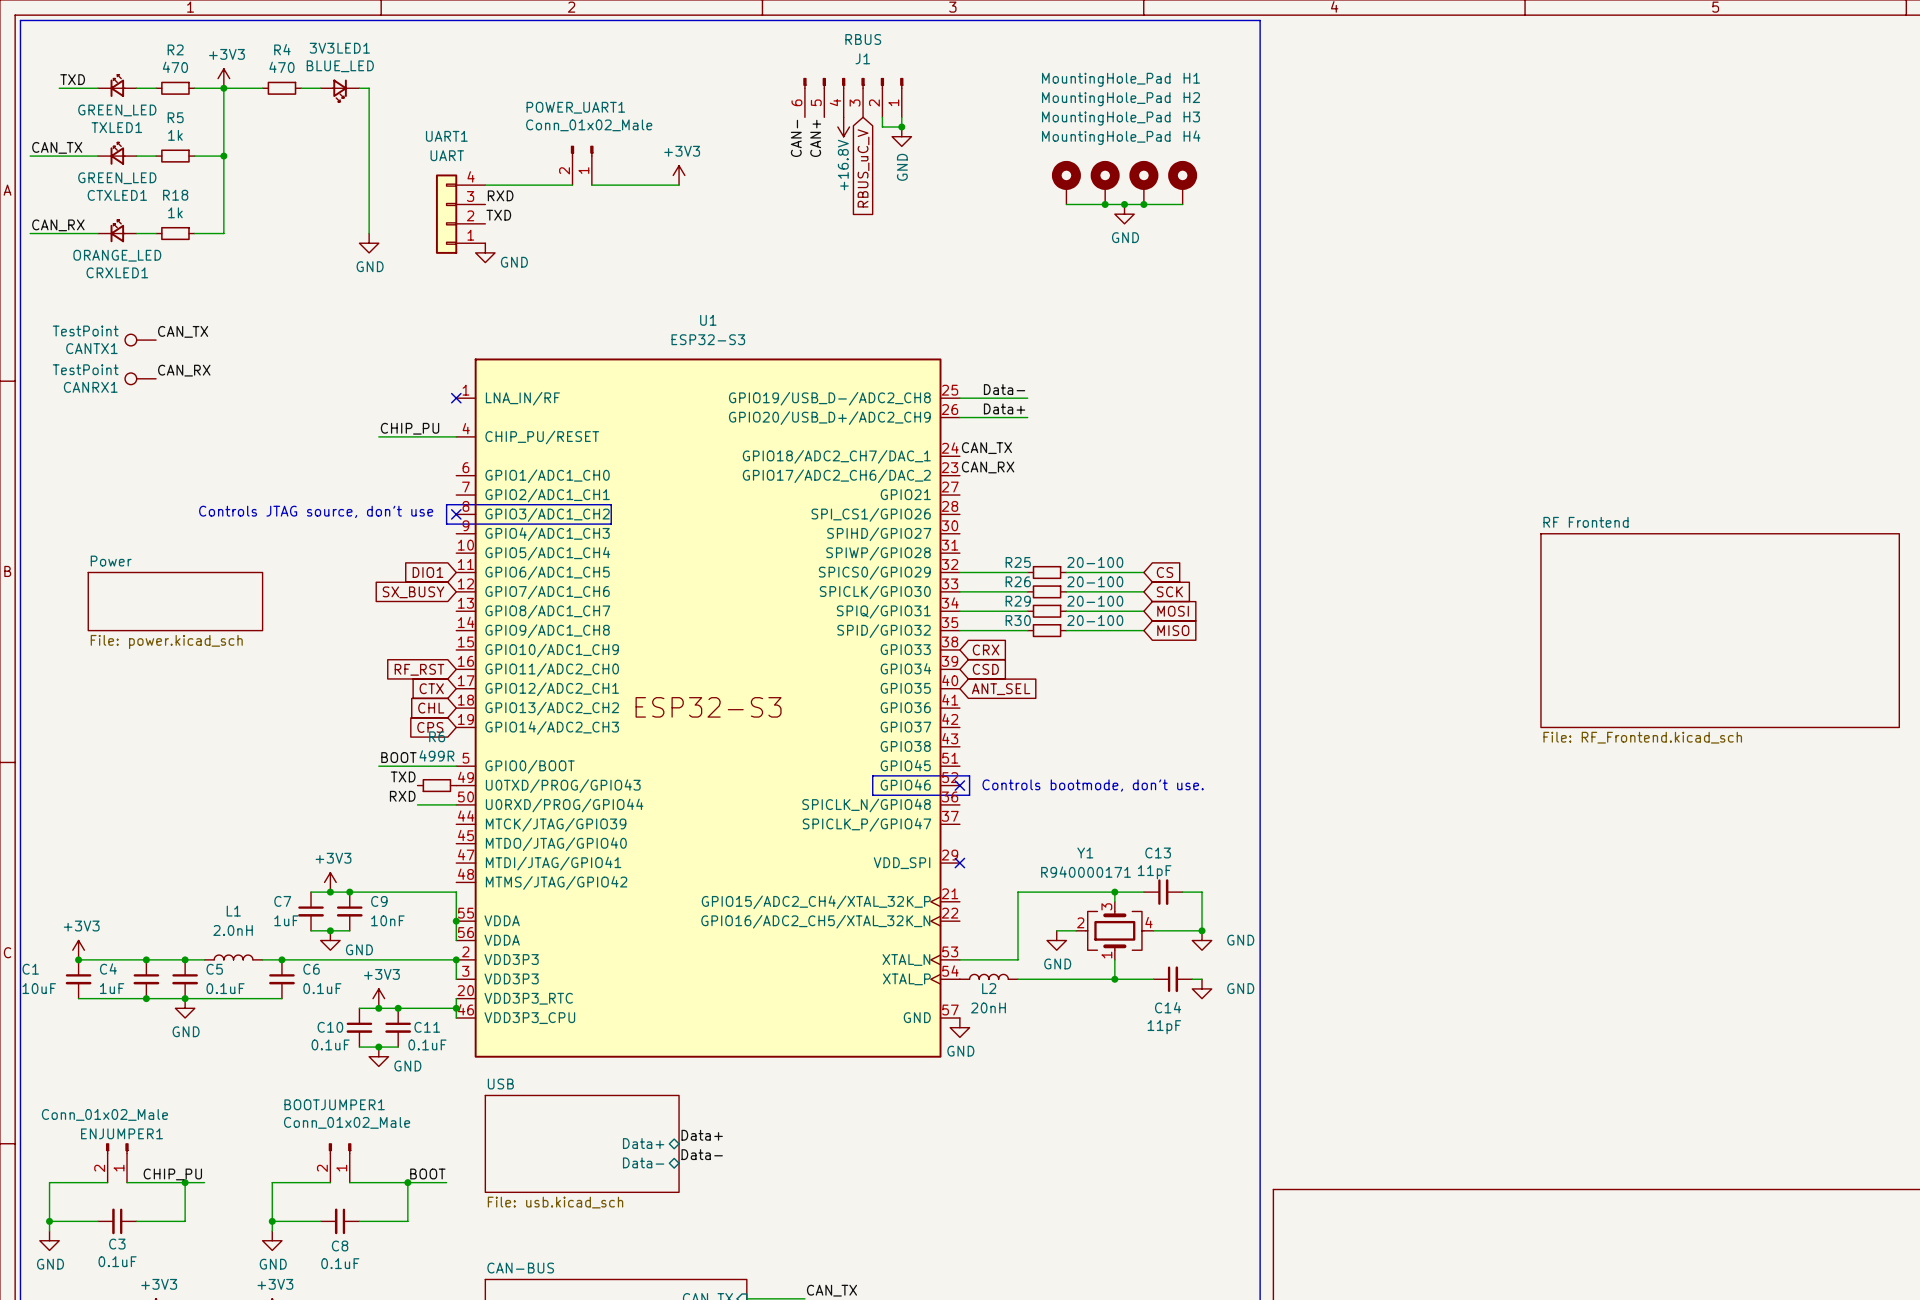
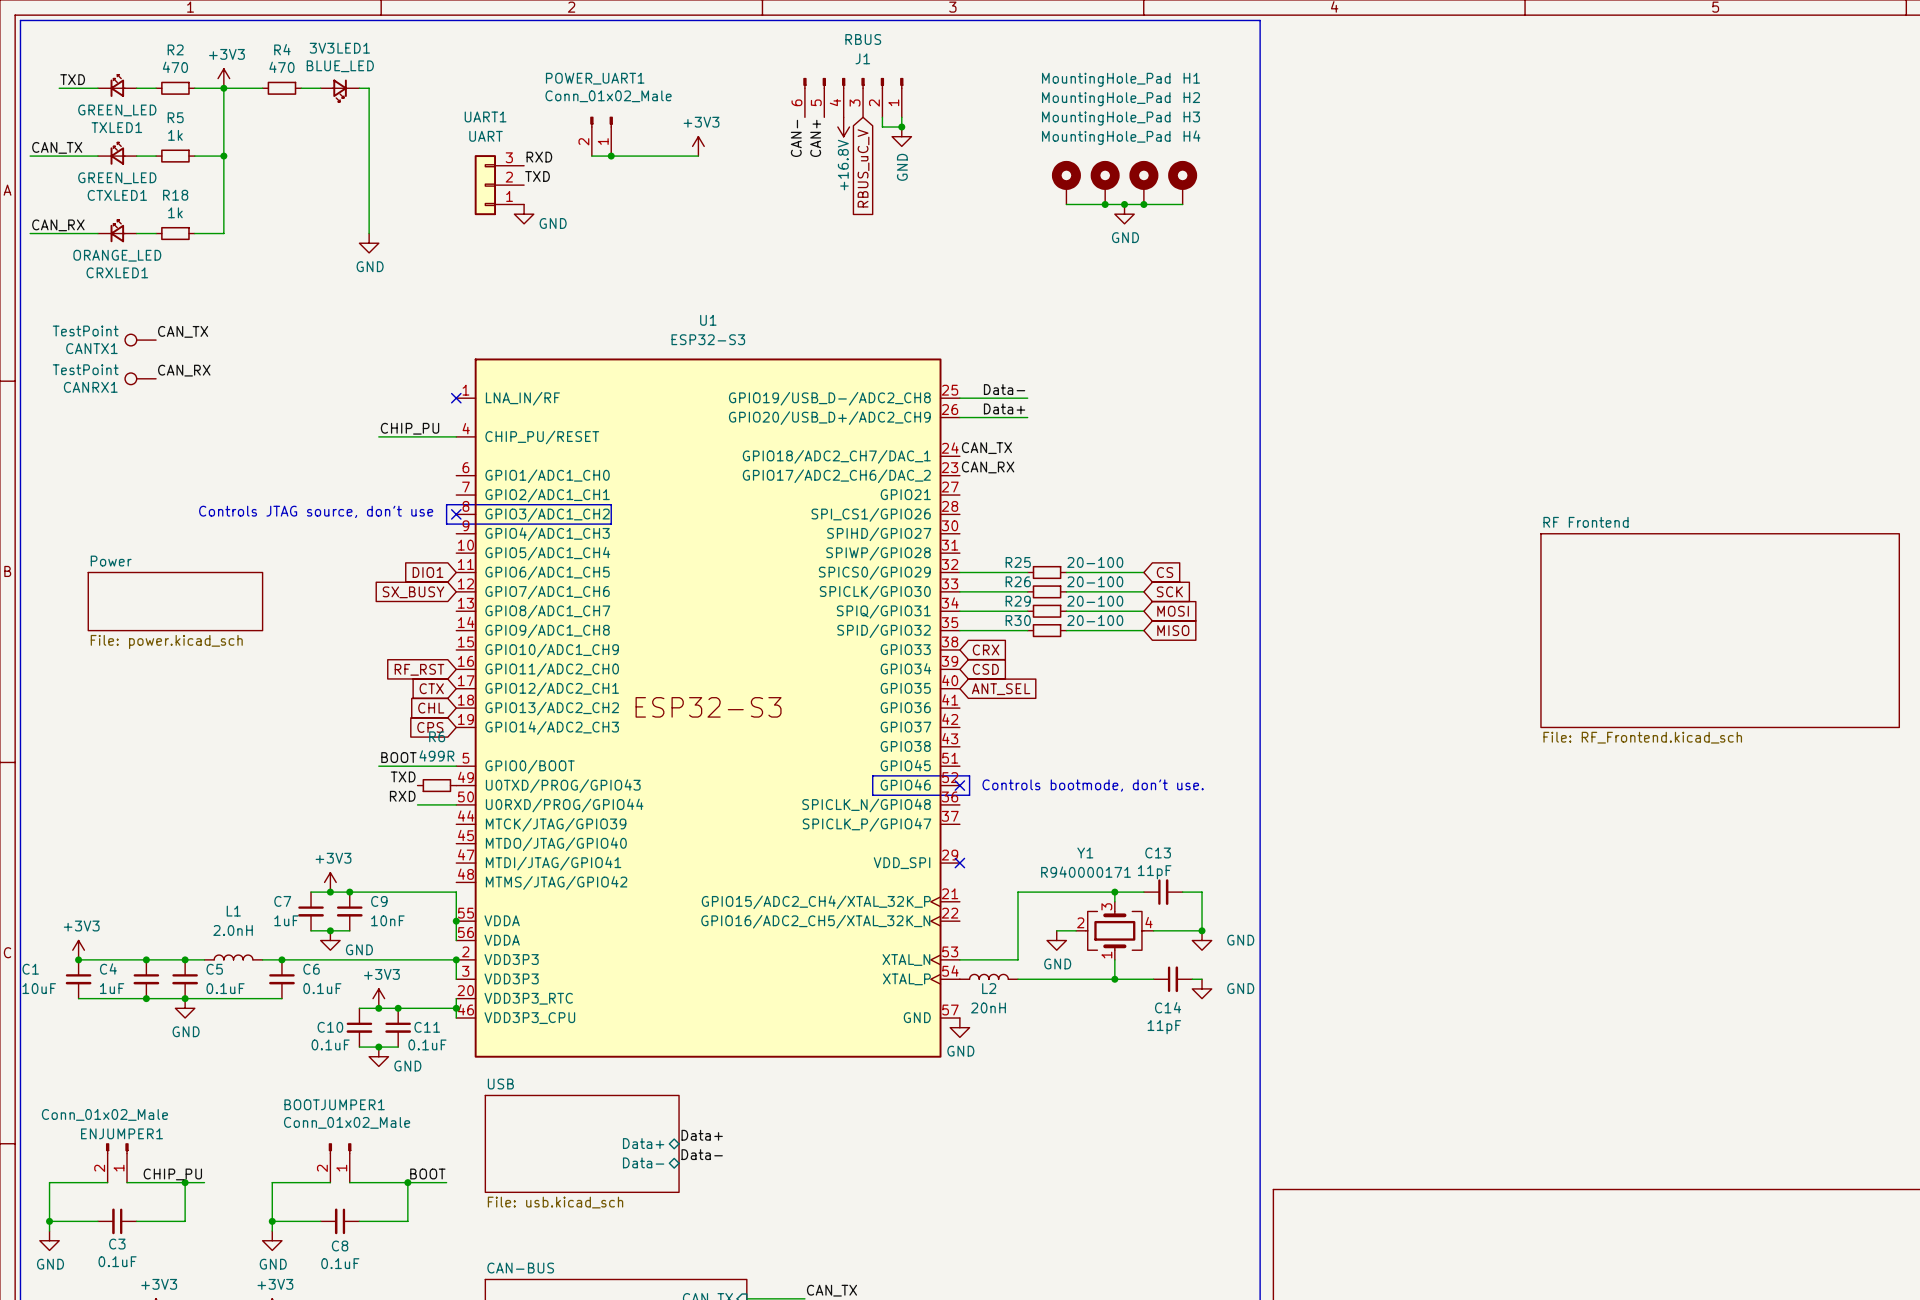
wire: none -> (591, 156) (698, 156)
junction: none -> (611, 156)
POWER_UART1 position: (582, 165) -> (601, 136)
UART1 symbol: [435, 174, 486, 254] -> [474, 155, 525, 216]
power symbol position: +3V3 (679, 175) -> +3V3 (698, 146)
wire: (485, 185) (572, 185) -> none
wire: (591, 185) (679, 185) -> none
label position: RXD (500, 195) -> RXD (539, 157)
label position: TXD (498, 215) -> TXD (537, 176)
power symbol position: GND (485, 252) -> GND (524, 214)

